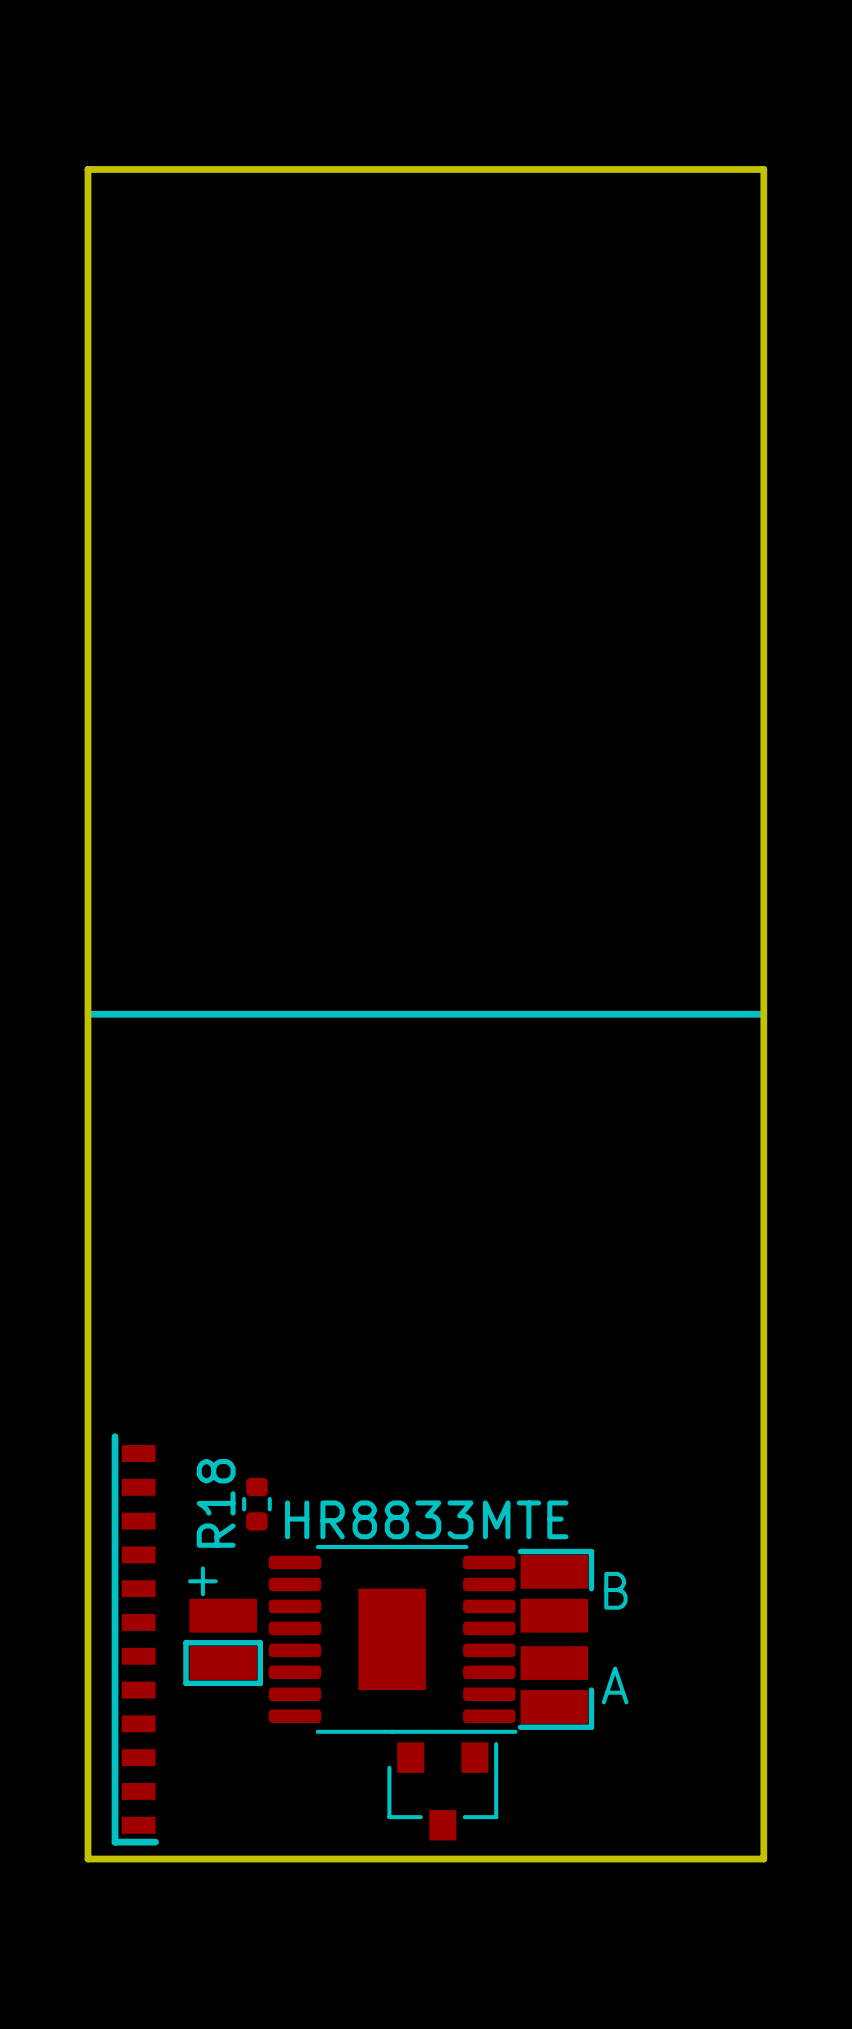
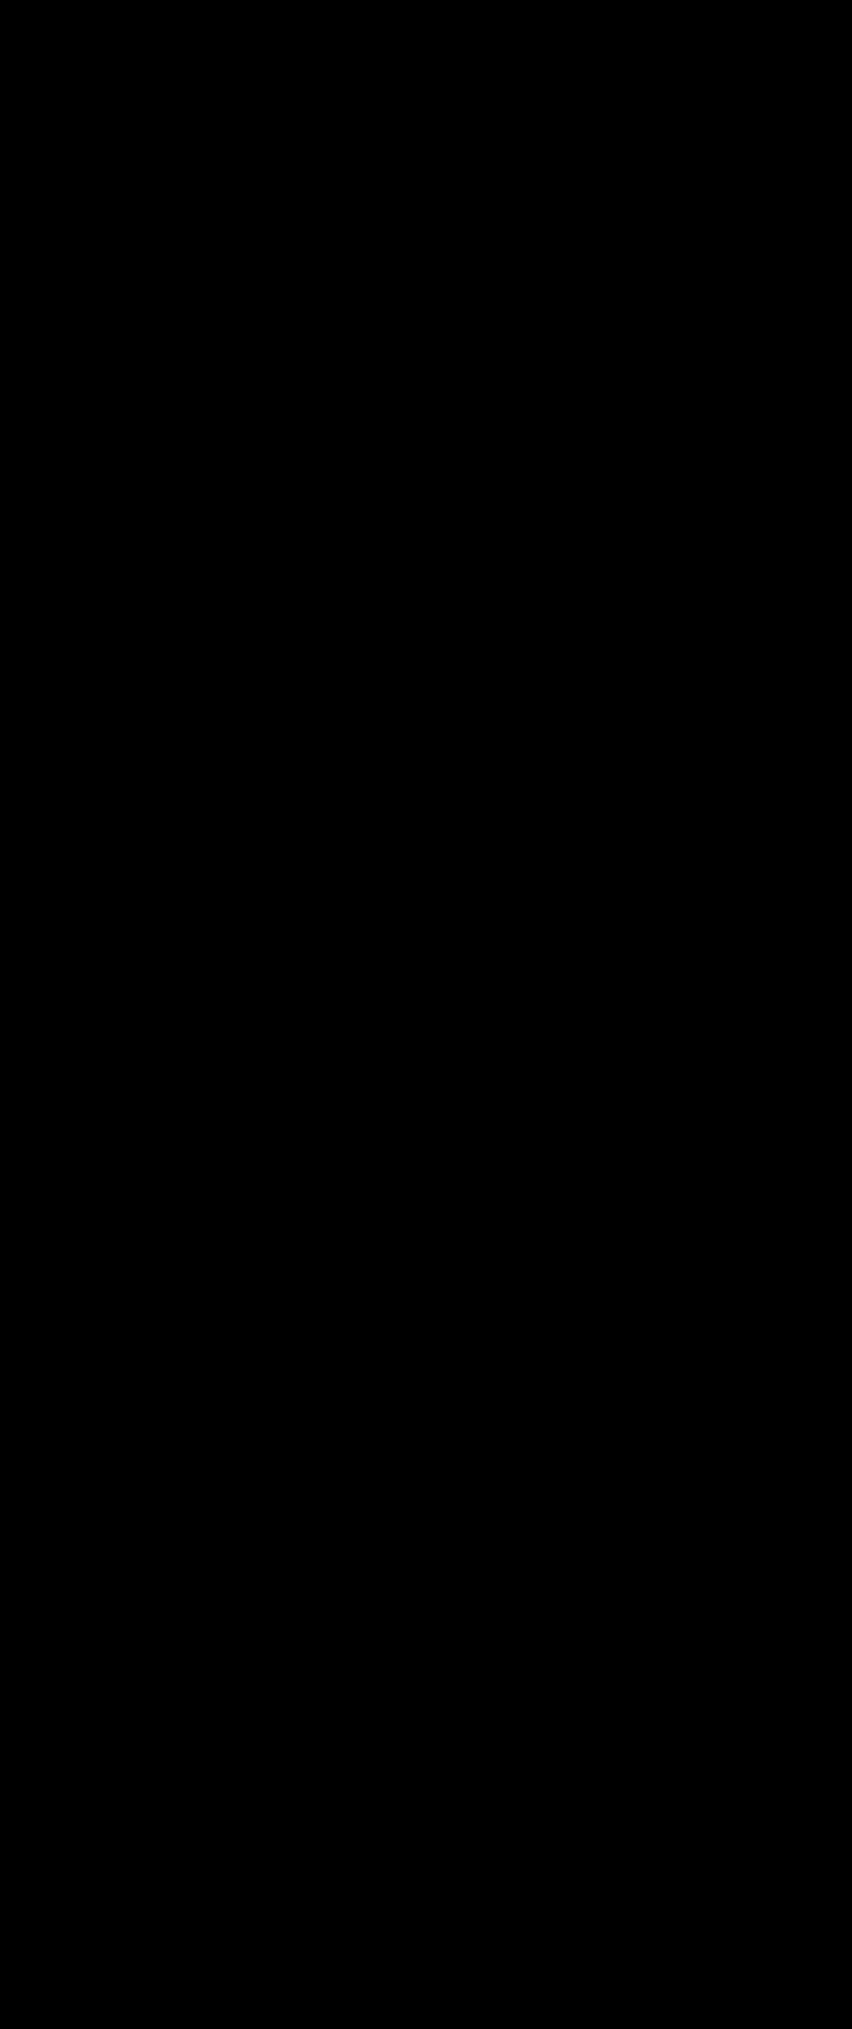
board edge: (87, 169) (87, 1859) (763, 1859) (763, 169) (87, 169) -> none
line: (87, 1014) (763, 1014) -> none
R18: (256, 1504) -> none
line: (520, 1551) (591, 1551) (591, 1588) -> none
part: (554, 1571) -> none
text: + (202, 1581) -> none
text: B (615, 1590) -> none
part: (223, 1615) -> none
part: (554, 1615) -> none
part: (135, 1639) -> none
part: HR8833MTE (393, 1639) -> none
line: (185, 1642) (185, 1683) (260, 1683) (260, 1642) (185, 1642) -> none
part: (223, 1663) -> none
part: (554, 1663) -> none
text: A (615, 1685) -> none
line: (591, 1690) (591, 1727) (520, 1727) -> none
part: (554, 1706) -> none
part: (442, 1791) -> none

